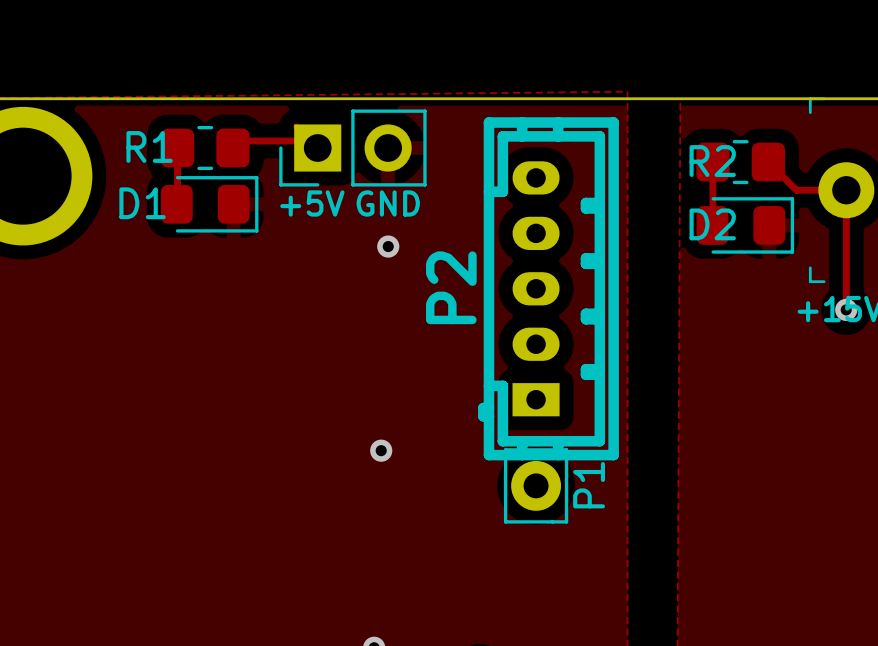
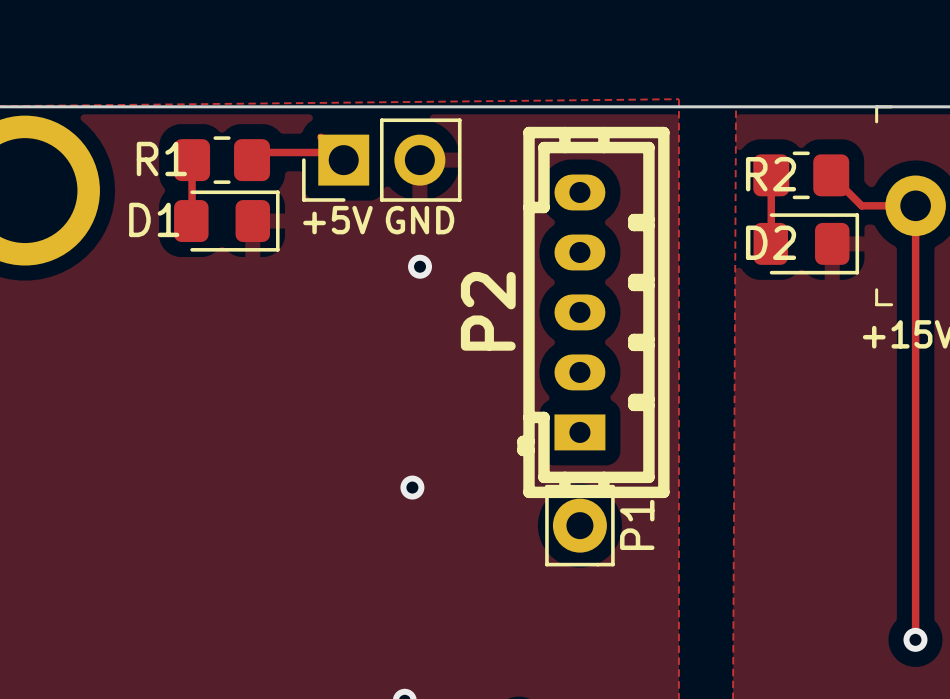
track: none -> (915, 335) (915, 639)
via: (846, 309) -> none
via: none -> (915, 639)

